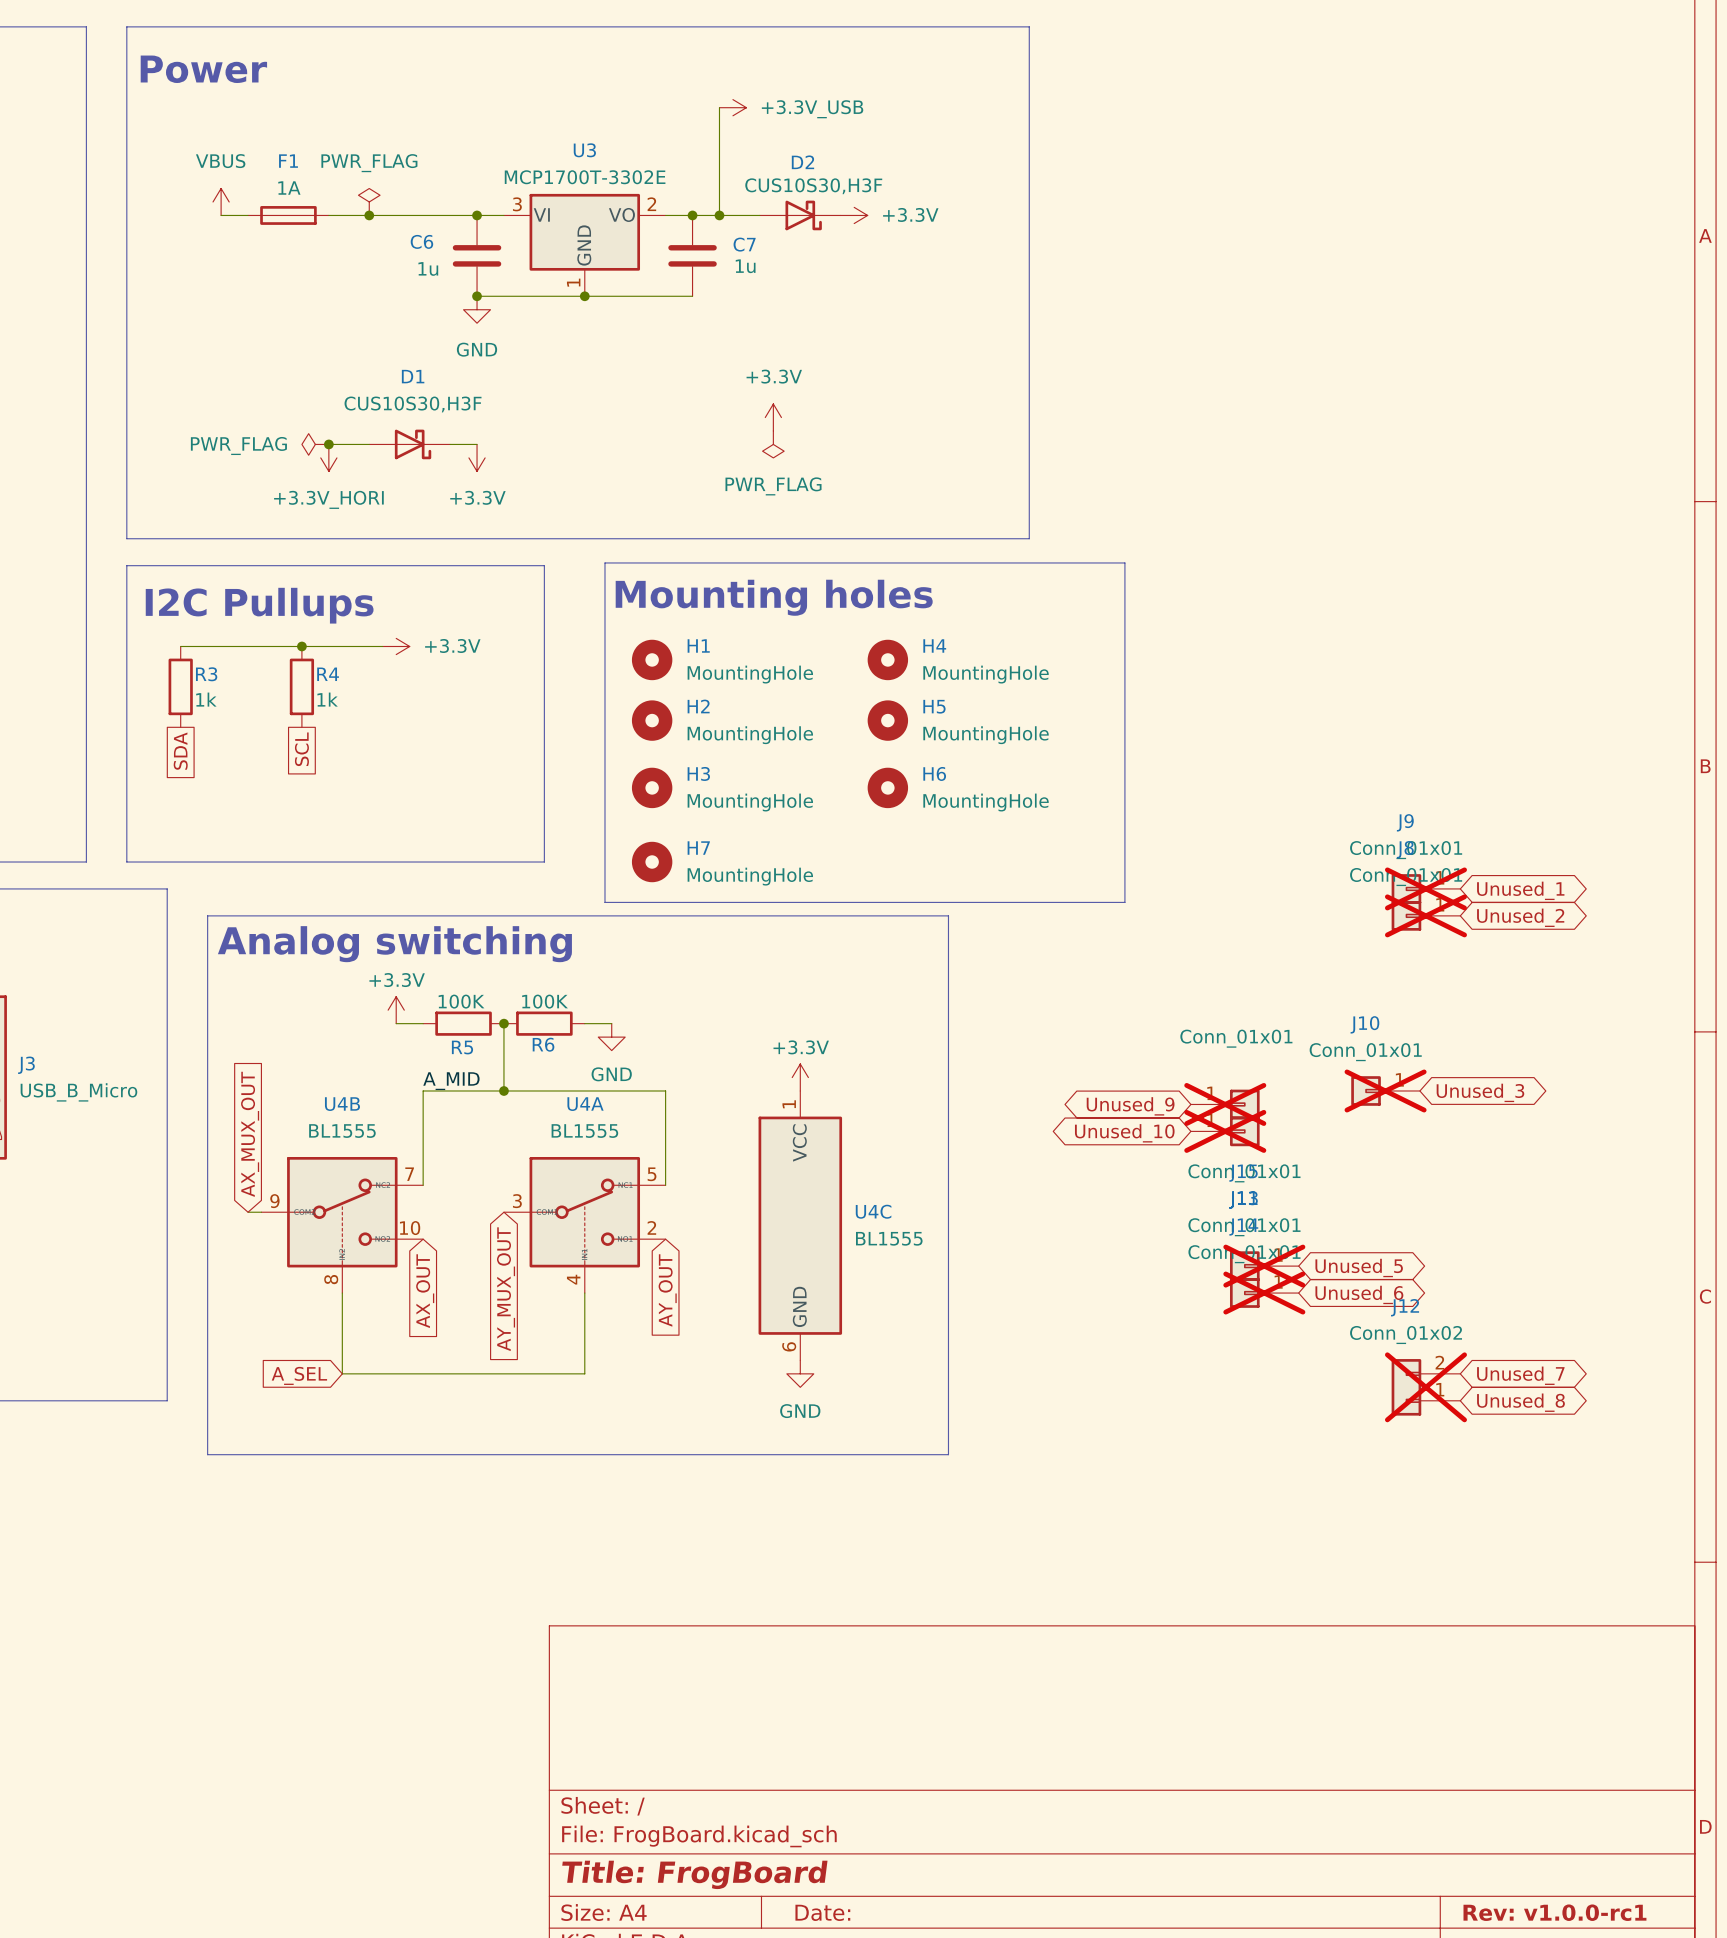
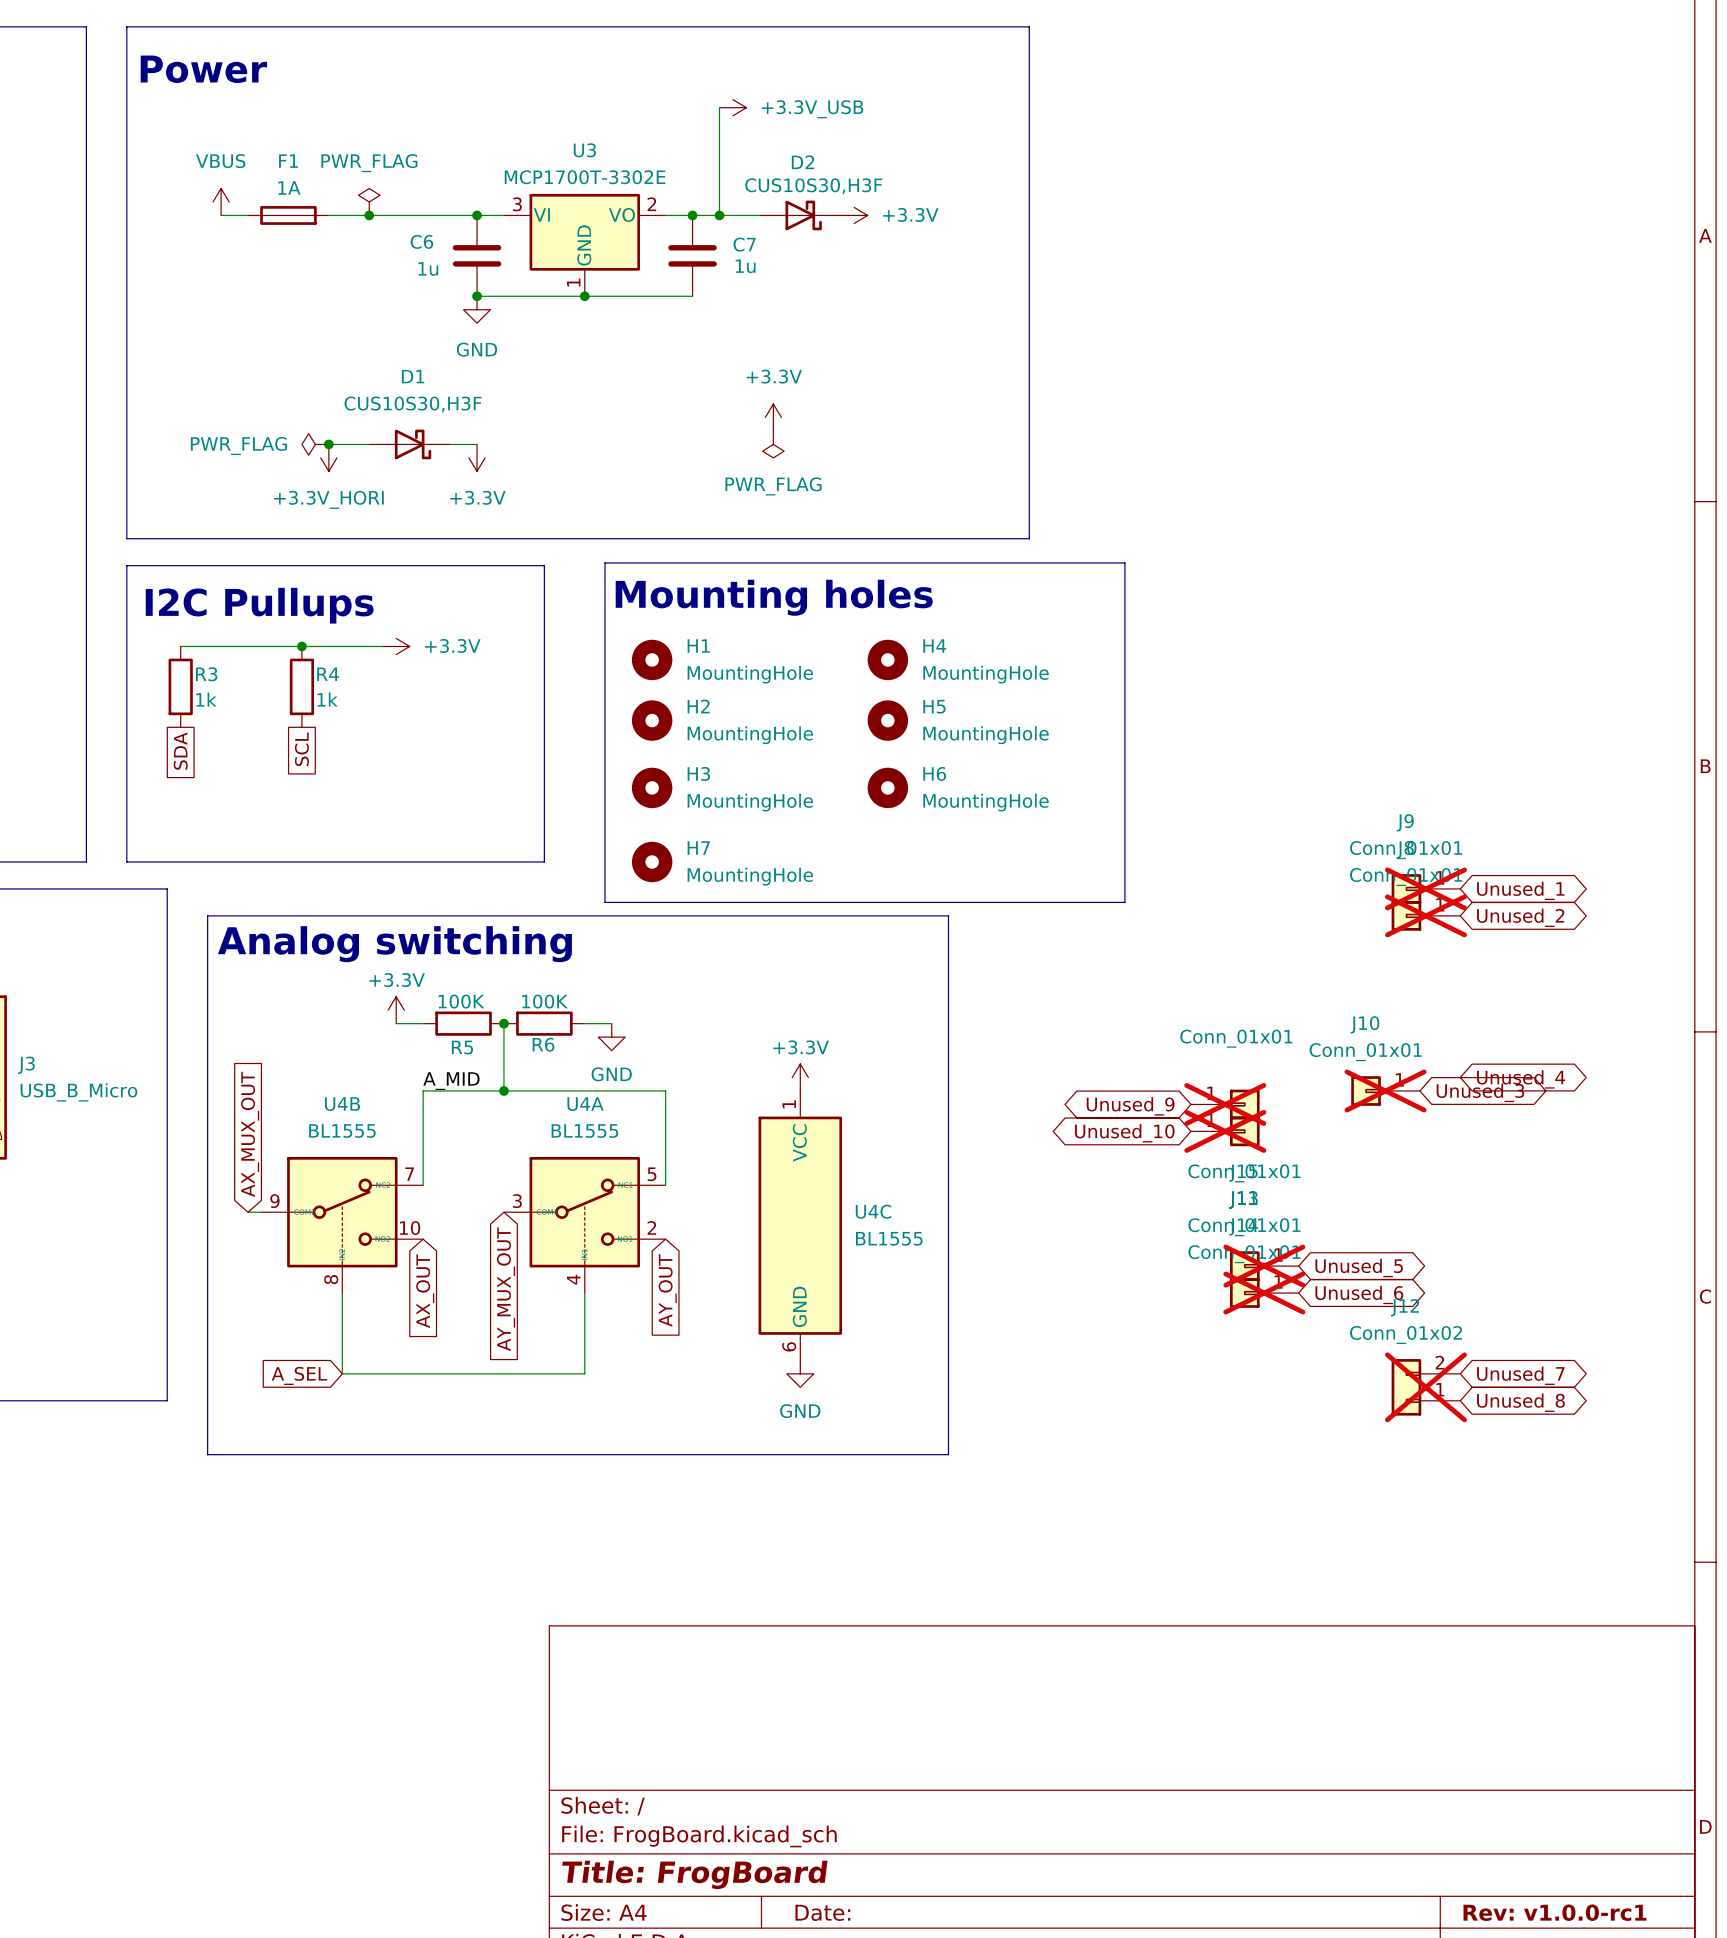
global label: none -> Unused_4 (1521, 1079)

